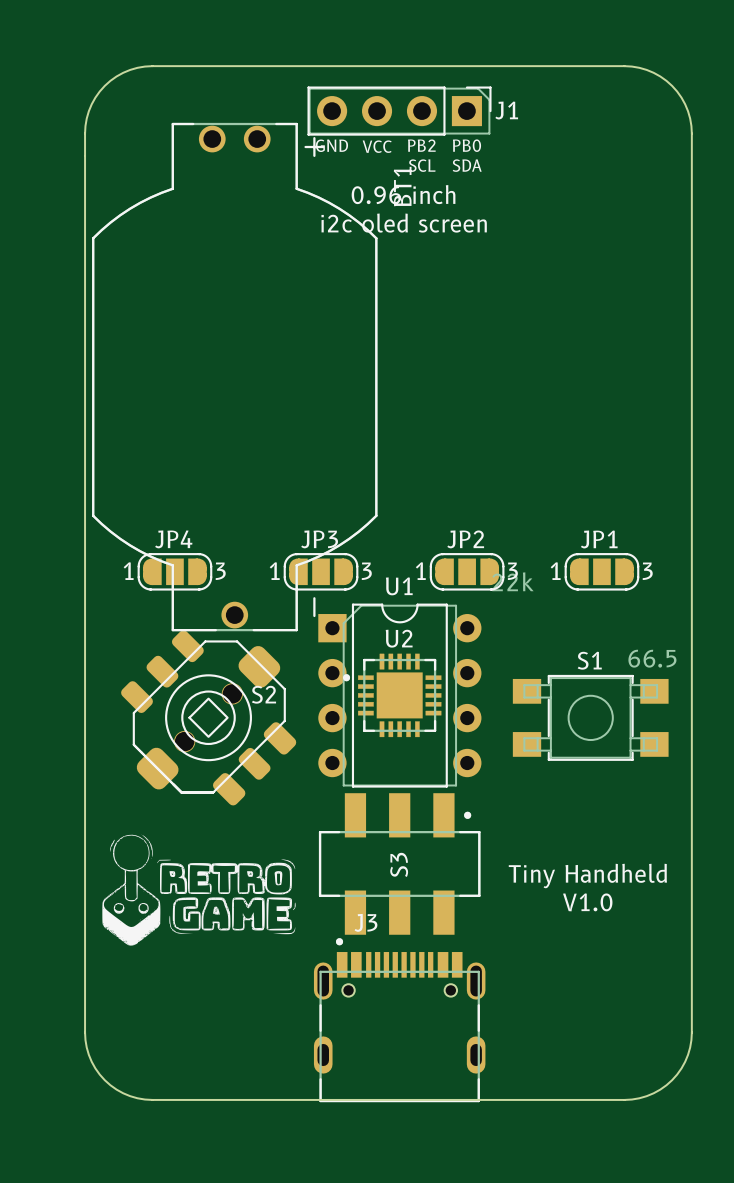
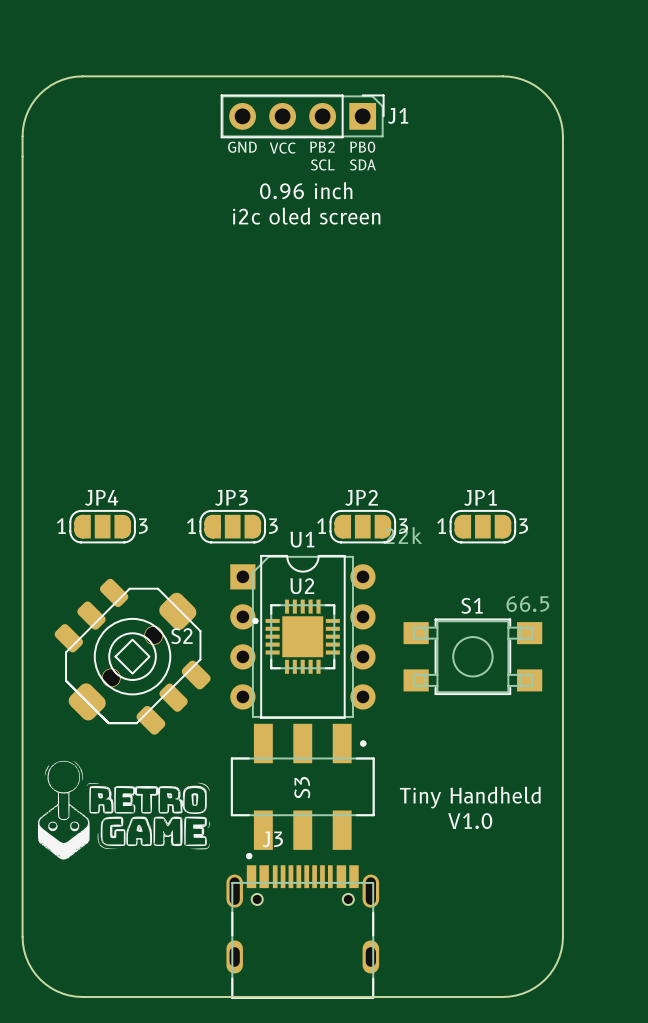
BT1: (234, 377) -> none

